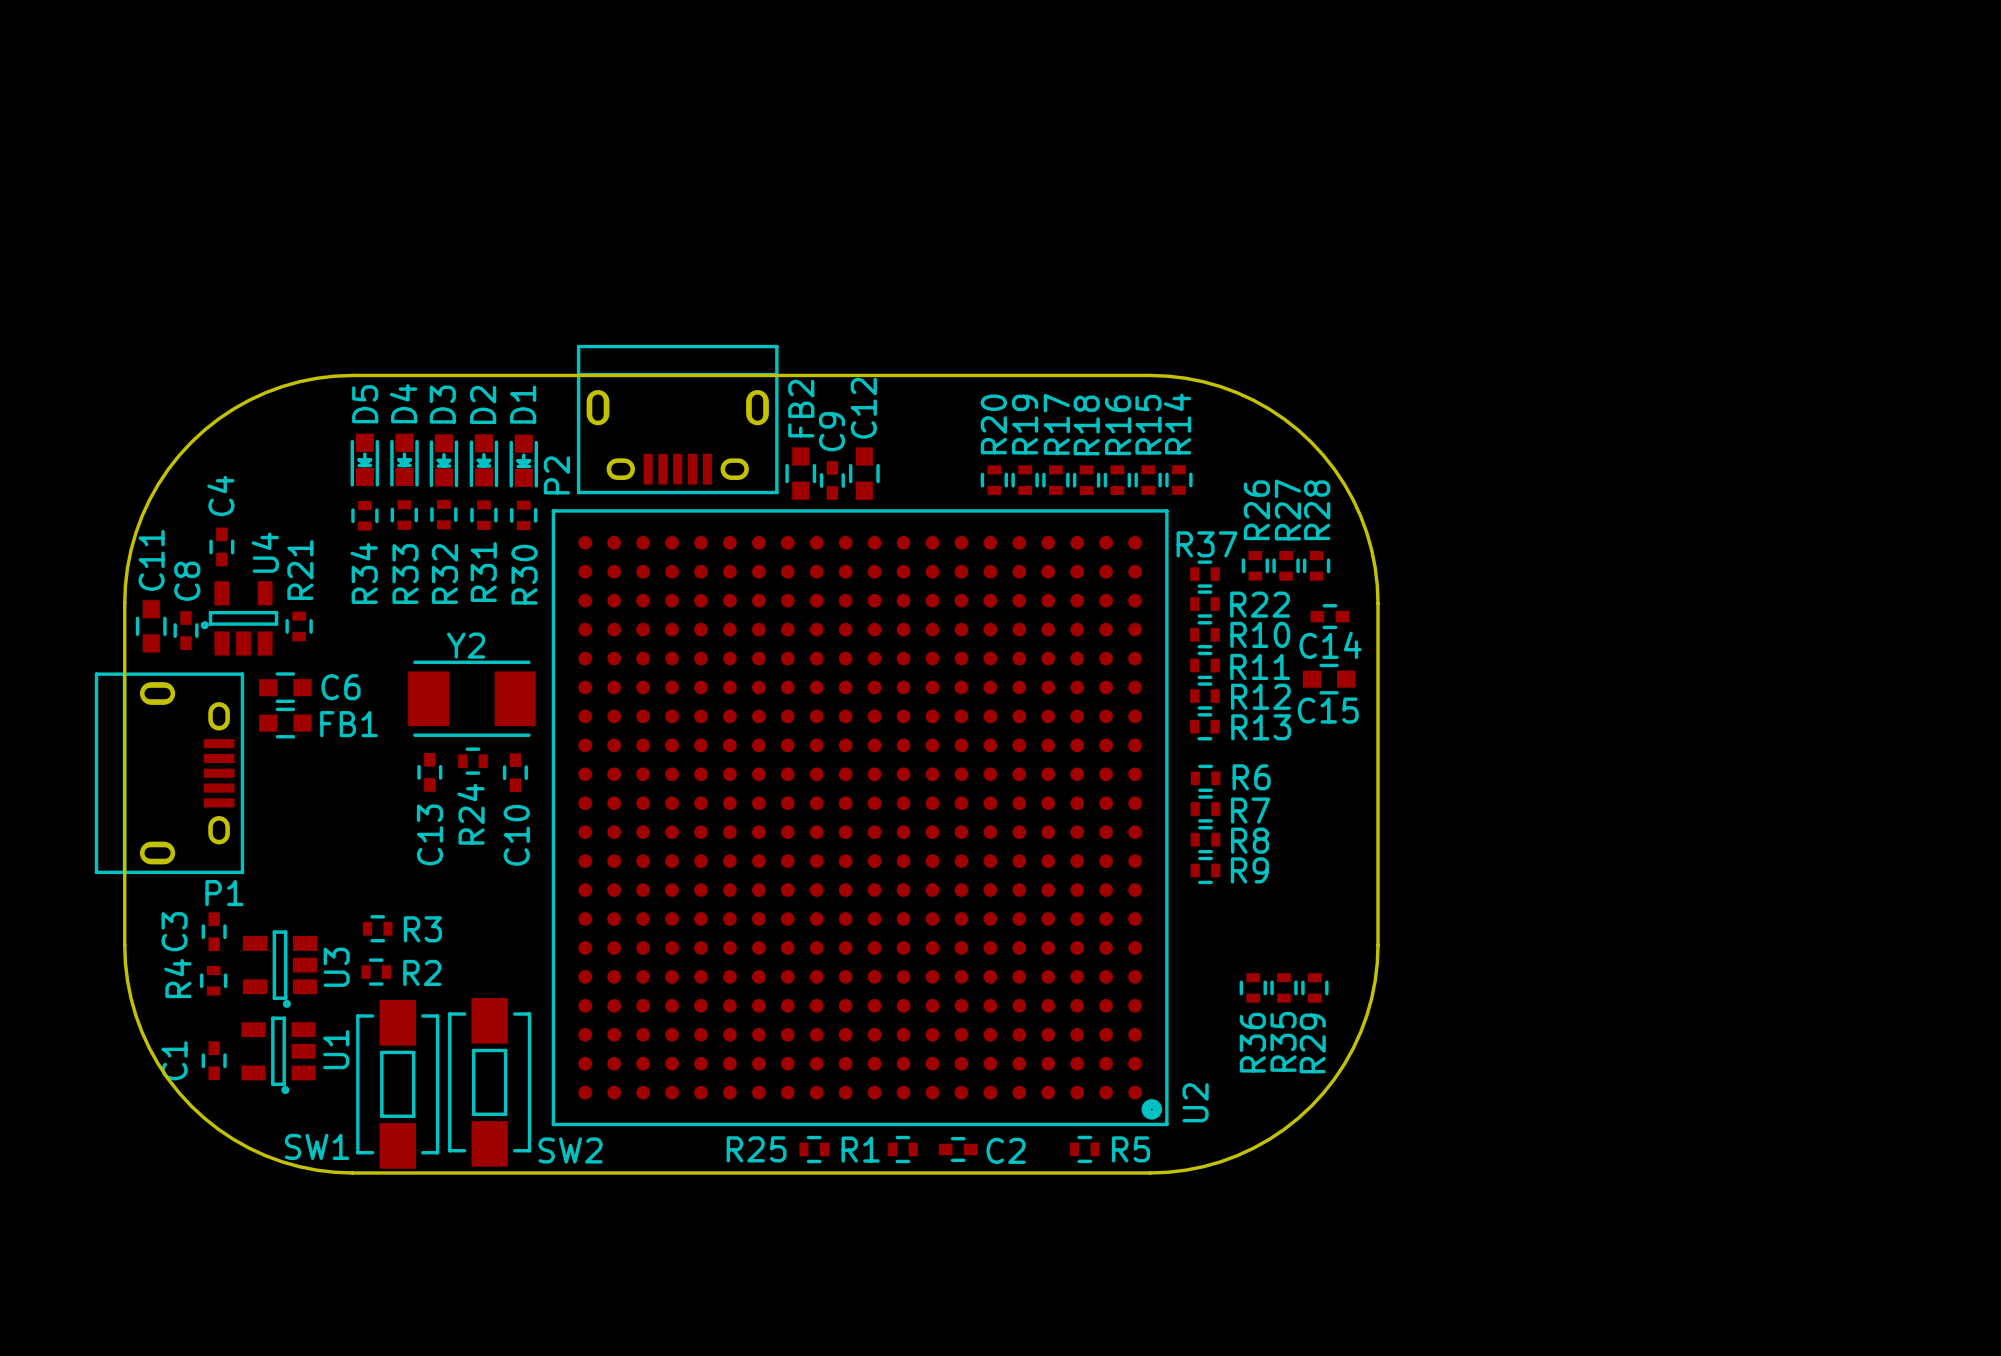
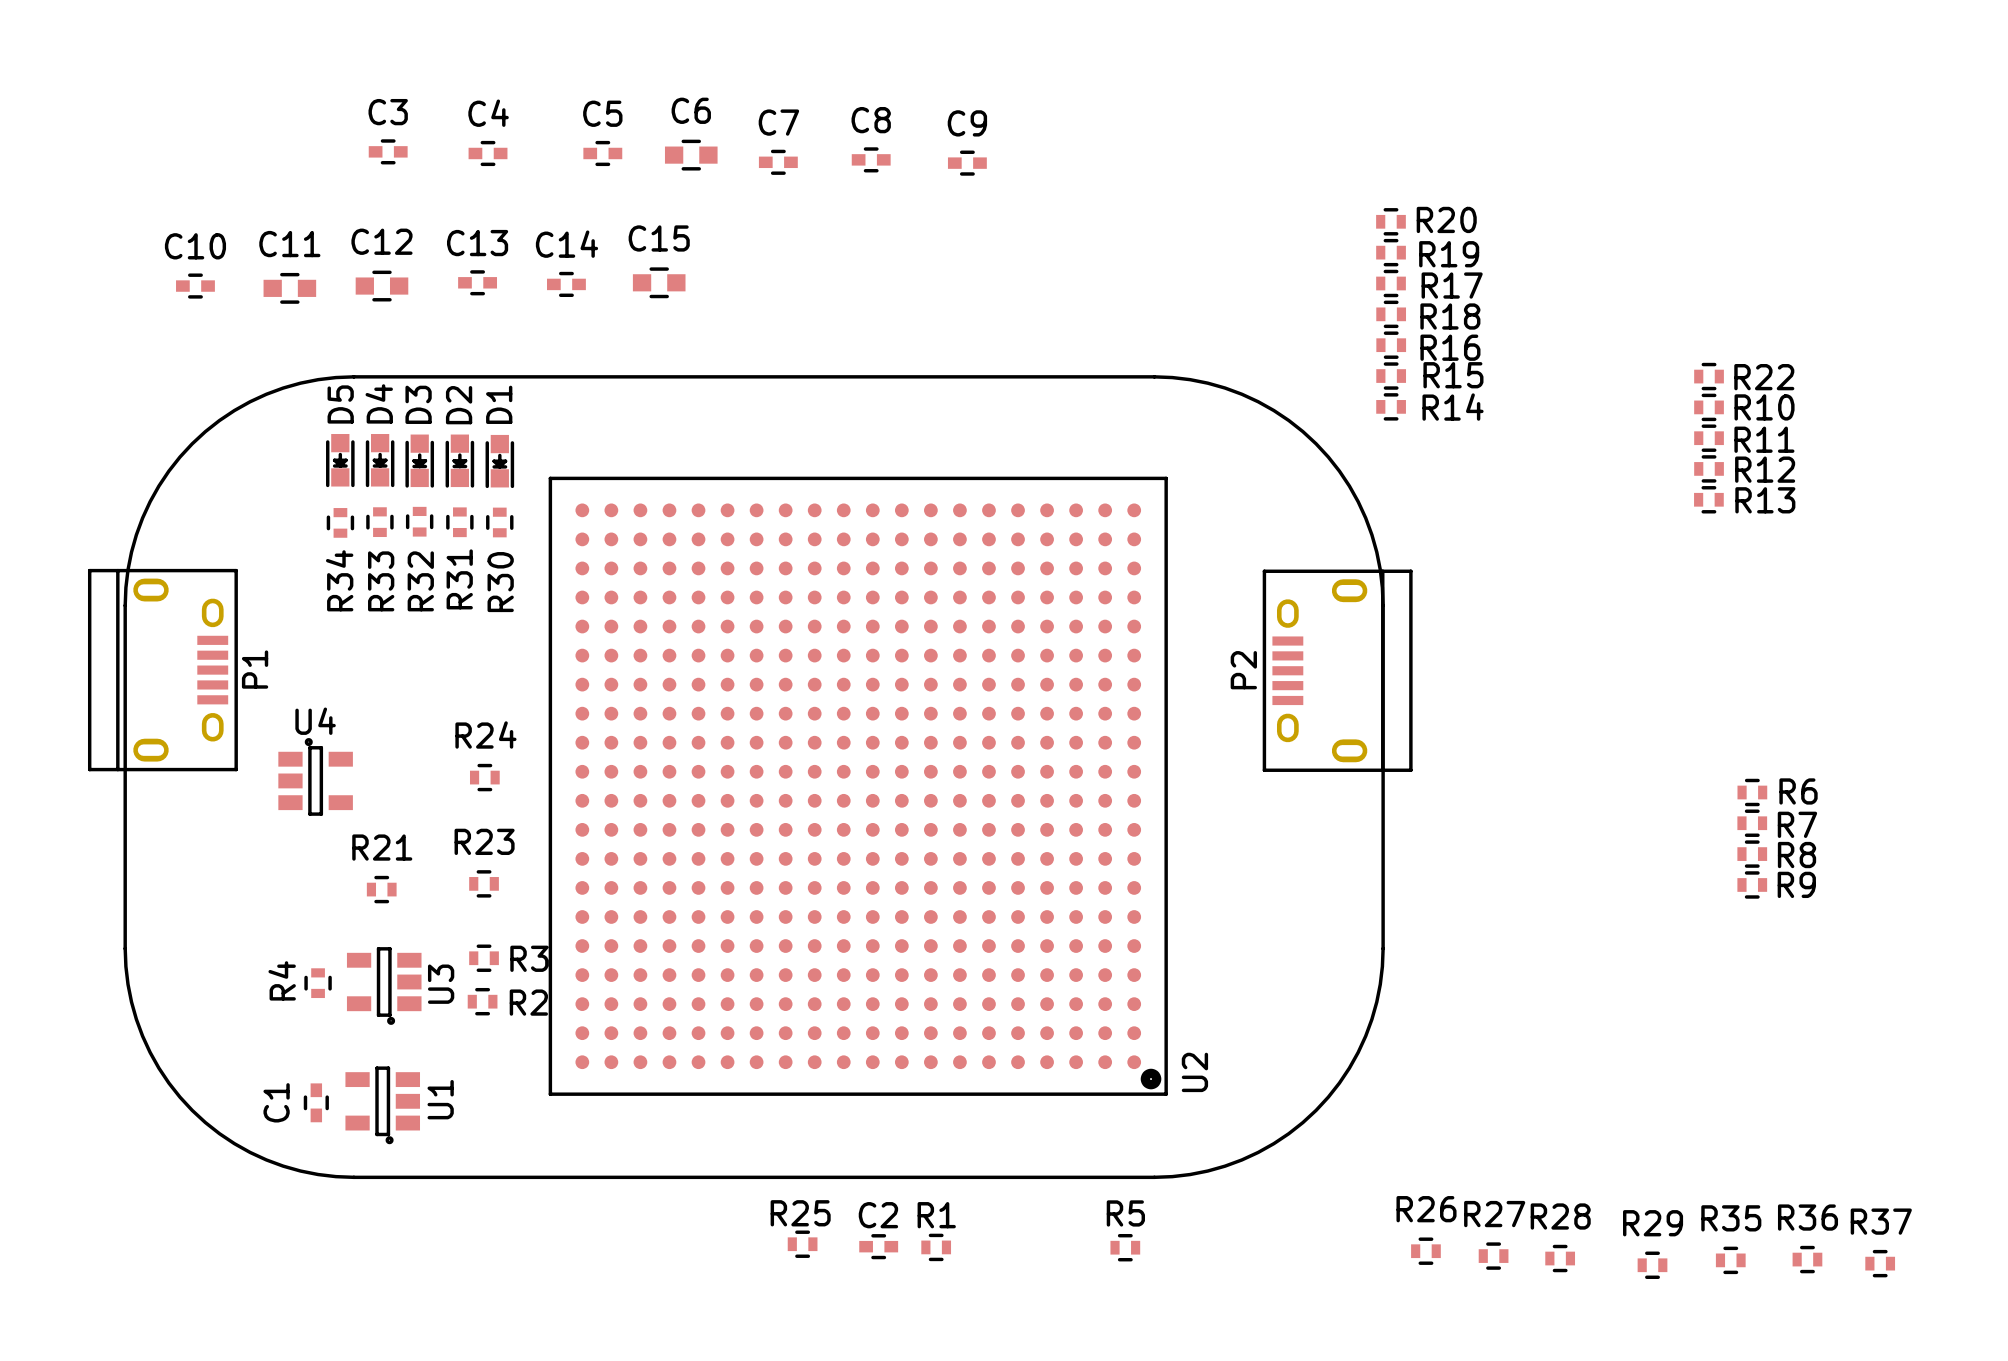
C5: none -> (602, 153)
C7: none -> (778, 162)
P2 rotation: 0° (677, 419) -> 90° clockwise (1337, 670)
P2 position: (677, 419) -> (1337, 670)
D5 position: (364, 460) -> (340, 460)
D4 position: (404, 460) -> (380, 460)
D3 position: (443, 460) -> (419, 461)
D2 position: (483, 460) -> (459, 461)
D1 position: (523, 461) -> (499, 461)
FB2: (800, 473) -> none
C12 rotation: 0° (864, 473) -> 90° clockwise (381, 286)
C12 position: (864, 473) -> (381, 286)
P2 name position: P2 (556, 475) -> P2 (1243, 670)
R14 rotation: 0° (1178, 479) -> 90° clockwise (1391, 406)
R14 position: (1178, 479) -> (1391, 406)
C9 rotation: 0° (832, 480) -> 90° clockwise (967, 163)
C9 position: (832, 480) -> (967, 163)
R20 rotation: 0° (994, 480) -> 90° clockwise (1390, 221)
R20 position: (994, 480) -> (1390, 221)
R19 rotation: 0° (1025, 480) -> 90° clockwise (1391, 252)
R19 position: (1025, 480) -> (1391, 252)
R17 rotation: 0° (1055, 480) -> 90° clockwise (1391, 283)
R17 position: (1055, 480) -> (1391, 283)
R18 rotation: 0° (1086, 480) -> 90° clockwise (1391, 314)
R18 position: (1086, 480) -> (1391, 314)
R16 rotation: 0° (1117, 480) -> 90° clockwise (1391, 345)
R16 position: (1117, 480) -> (1391, 345)
R15 rotation: 0° (1148, 480) -> 90° clockwise (1391, 376)
R15 position: (1148, 480) -> (1391, 376)
R32 position: (443, 514) -> (419, 521)
R34 position: (364, 515) -> (340, 522)
R33 position: (404, 515) -> (379, 522)
R31 position: (483, 515) -> (459, 522)
R30 position: (523, 515) -> (499, 522)
R37 name position: R37 (1206, 544) -> R37 (1881, 1221)
C4 rotation: 0° (221, 546) -> 90° clockwise (488, 153)
C4 position: (221, 546) -> (488, 153)
R26 rotation: 0° (1255, 565) -> 90° clockwise (1425, 1251)
R26 position: (1255, 565) -> (1425, 1251)
R27 rotation: 0° (1286, 565) -> 90° clockwise (1493, 1256)
R27 position: (1286, 565) -> (1493, 1256)
R28 rotation: 0° (1316, 565) -> 90° clockwise (1560, 1258)
R28 position: (1316, 565) -> (1560, 1258)
R37 position: (1204, 574) -> (1880, 1263)
R22 position: (1204, 604) -> (1709, 376)
C14 position: (1329, 616) -> (566, 284)
U4 rotation: 0° (239, 618) -> 90° clockwise (315, 776)
U4 position: (239, 618) -> (315, 776)
C11 rotation: 0° (151, 626) -> 90° clockwise (289, 288)
C11 position: (151, 626) -> (289, 288)
R21 rotation: 0° (299, 626) -> 90° clockwise (381, 889)
R21 position: (299, 626) -> (381, 889)
C8 rotation: 0° (186, 630) -> 90° clockwise (871, 159)
C8 position: (186, 630) -> (871, 159)
R10 position: (1204, 634) -> (1709, 407)
C14 name position: C14 (1330, 645) -> C14 (566, 244)
R11 position: (1204, 665) -> (1709, 438)
C15 position: (1329, 679) -> (659, 282)
C6 position: (285, 687) -> (691, 155)
C6 name position: C6 (341, 687) -> C6 (691, 110)
R12 position: (1204, 696) -> (1709, 468)
Y2: (471, 698) -> none
C15 name position: C15 (1328, 710) -> C15 (659, 238)
FB1: (285, 723) -> none
R13 position: (1204, 726) -> (1708, 499)
R24 position: (472, 761) -> (484, 777)
C13 rotation: 0° (429, 772) -> 90° clockwise (477, 282)
C13 position: (429, 772) -> (477, 282)
C10 rotation: 0° (515, 772) -> 90° clockwise (195, 286)
C10 position: (515, 772) -> (195, 286)
P1 position: (169, 773) -> (162, 670)
R6 position: (1205, 778) -> (1752, 792)
R7 position: (1205, 808) -> (1752, 823)
R24 name rotation: 0° (471, 814) -> 90° clockwise (485, 735)
R24 name position: R24 (471, 814) -> R24 (485, 735)
U2 position: (860, 817) -> (858, 786)
C13 name position: C13 (430, 834) -> C13 (477, 243)
C10 name position: C10 (516, 835) -> C10 (195, 246)
R8 position: (1205, 839) -> (1752, 854)
R9 position: (1205, 870) -> (1752, 884)
R23: none -> (484, 883)
P1 name rotation: 0° (224, 893) -> 90° counterclockwise (255, 669)
P1 name position: P1 (224, 893) -> P1 (255, 669)
R3 position: (377, 928) -> (484, 958)
C3 rotation: 0° (214, 931) -> 90° clockwise (388, 151)
C3 position: (214, 931) -> (388, 151)
U3 position: (280, 969) -> (384, 986)
R2 position: (376, 972) -> (482, 1001)
R4 position: (213, 980) -> (318, 983)
R36 rotation: 0° (1253, 987) -> 90° clockwise (1807, 1259)
R36 position: (1253, 987) -> (1807, 1259)
R35 rotation: 0° (1283, 987) -> 90° clockwise (1730, 1260)
R35 position: (1283, 987) -> (1730, 1260)
R29 rotation: 0° (1314, 987) -> 90° clockwise (1652, 1265)
R29 position: (1314, 987) -> (1652, 1265)
R35 name position: R35 (1283, 1041) -> R35 (1731, 1218)
R36 name position: R36 (1252, 1042) -> R36 (1808, 1217)
R29 name position: R29 (1312, 1043) -> R29 (1653, 1223)
U1 position: (278, 1055) -> (382, 1105)
C1 position: (214, 1060) -> (316, 1102)
SW2: (489, 1082) -> none
SW1: (397, 1084) -> none
R25 name position: R25 (756, 1149) -> R25 (800, 1213)
R25 position: (814, 1149) -> (802, 1244)
R1 name position: R1 (860, 1149) -> R1 (936, 1215)
R1 position: (902, 1149) -> (936, 1247)
C2 position: (958, 1149) -> (878, 1246)
R5 position: (1084, 1149) -> (1125, 1247)
R5 name position: R5 (1131, 1149) -> R5 (1125, 1213)
C2 name position: C2 (1006, 1150) -> C2 (878, 1215)

